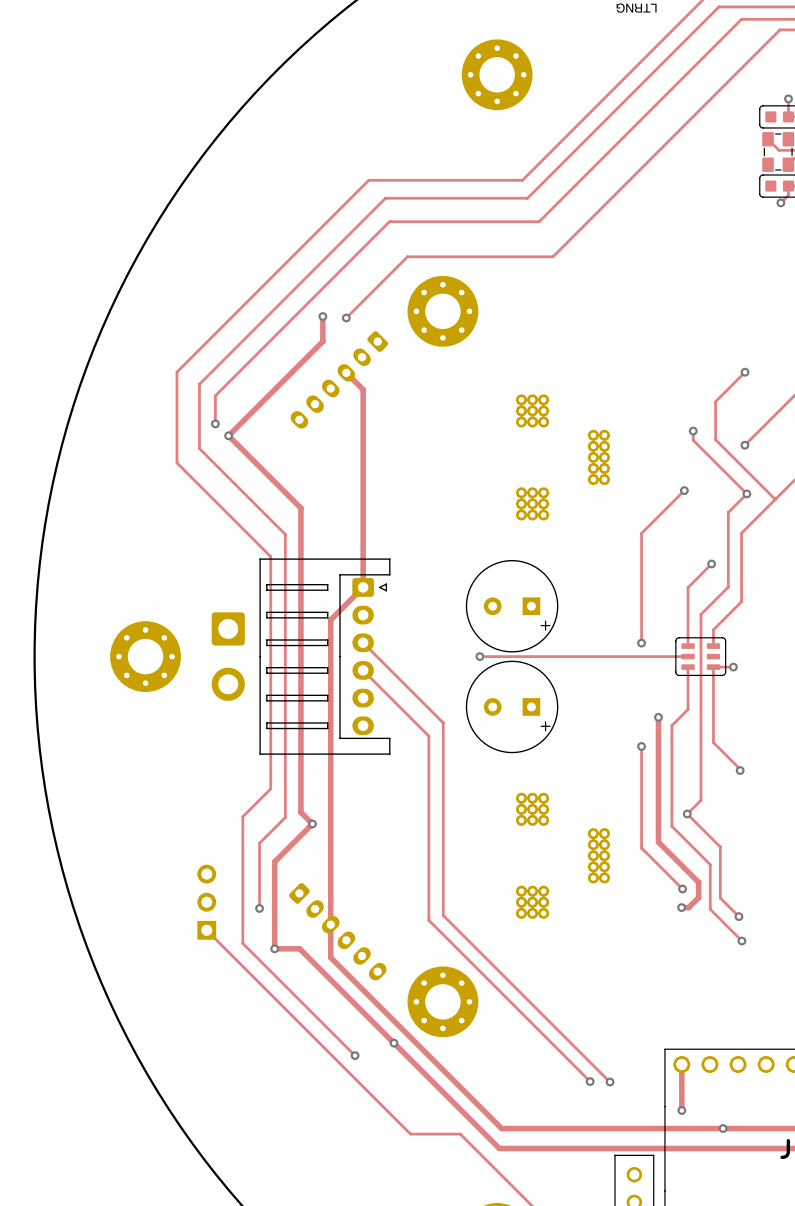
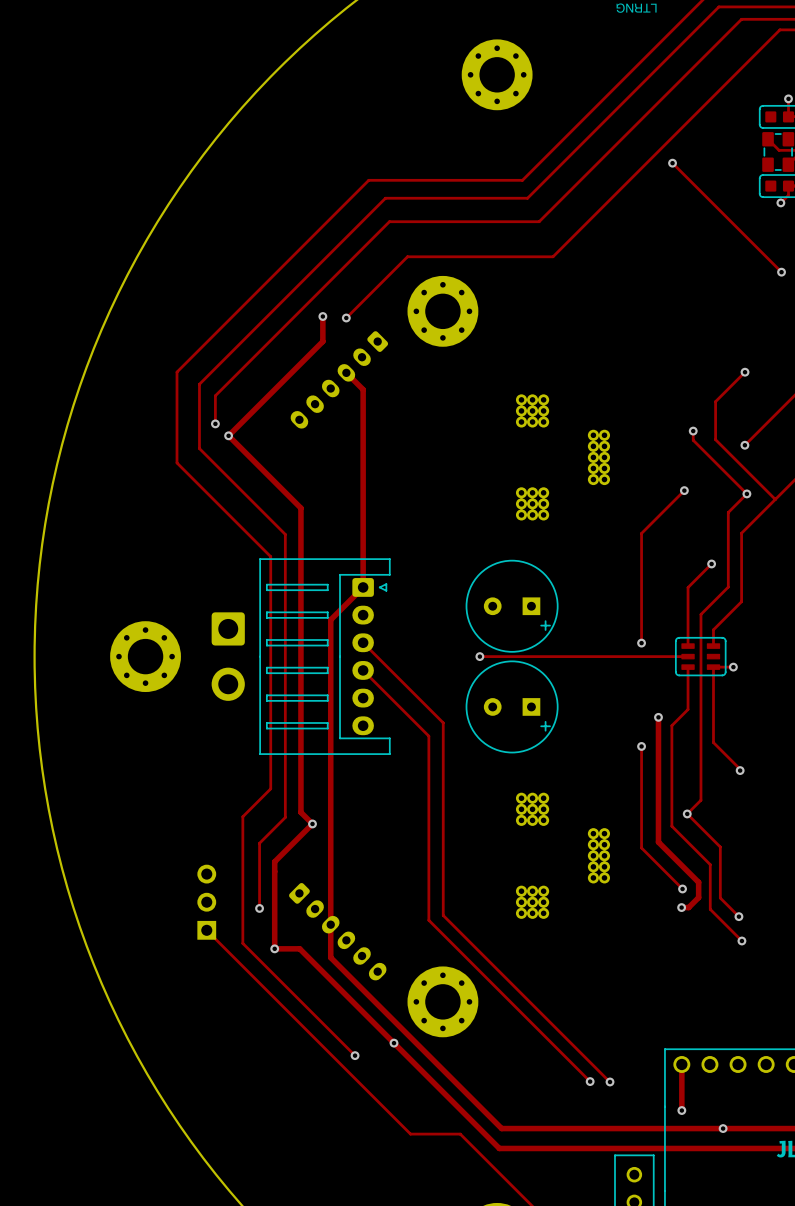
track: none -> (672, 163) (781, 272)
via: none -> (672, 163)
via: none -> (781, 272)

